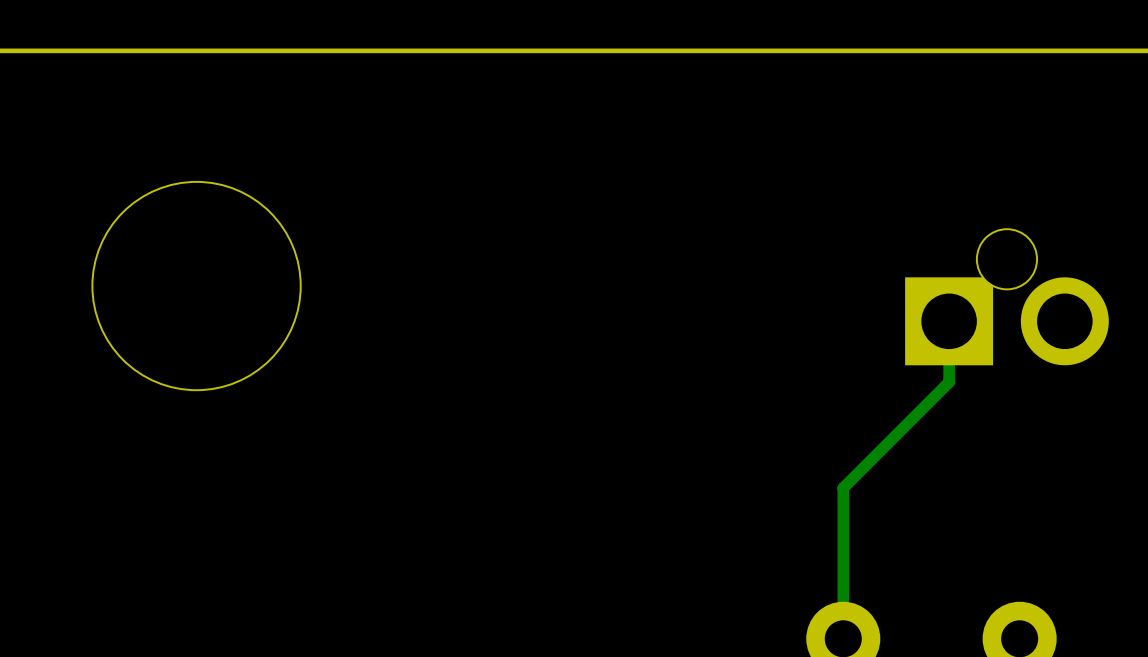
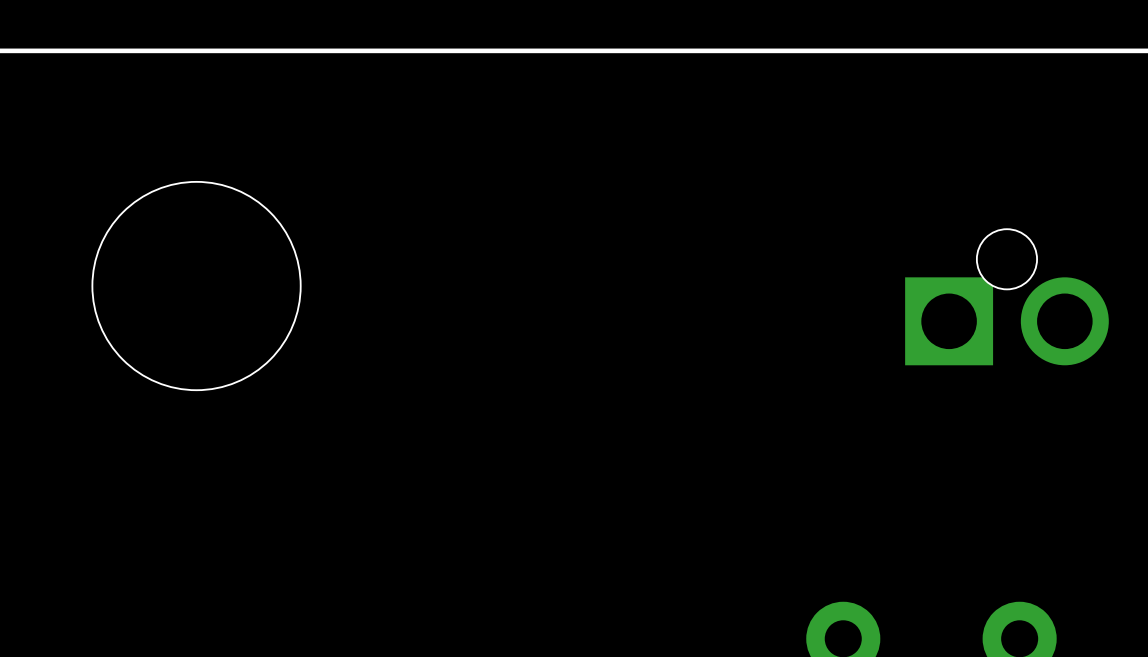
track: (949, 321) (949, 382) (843, 488) (843, 638) -> none

